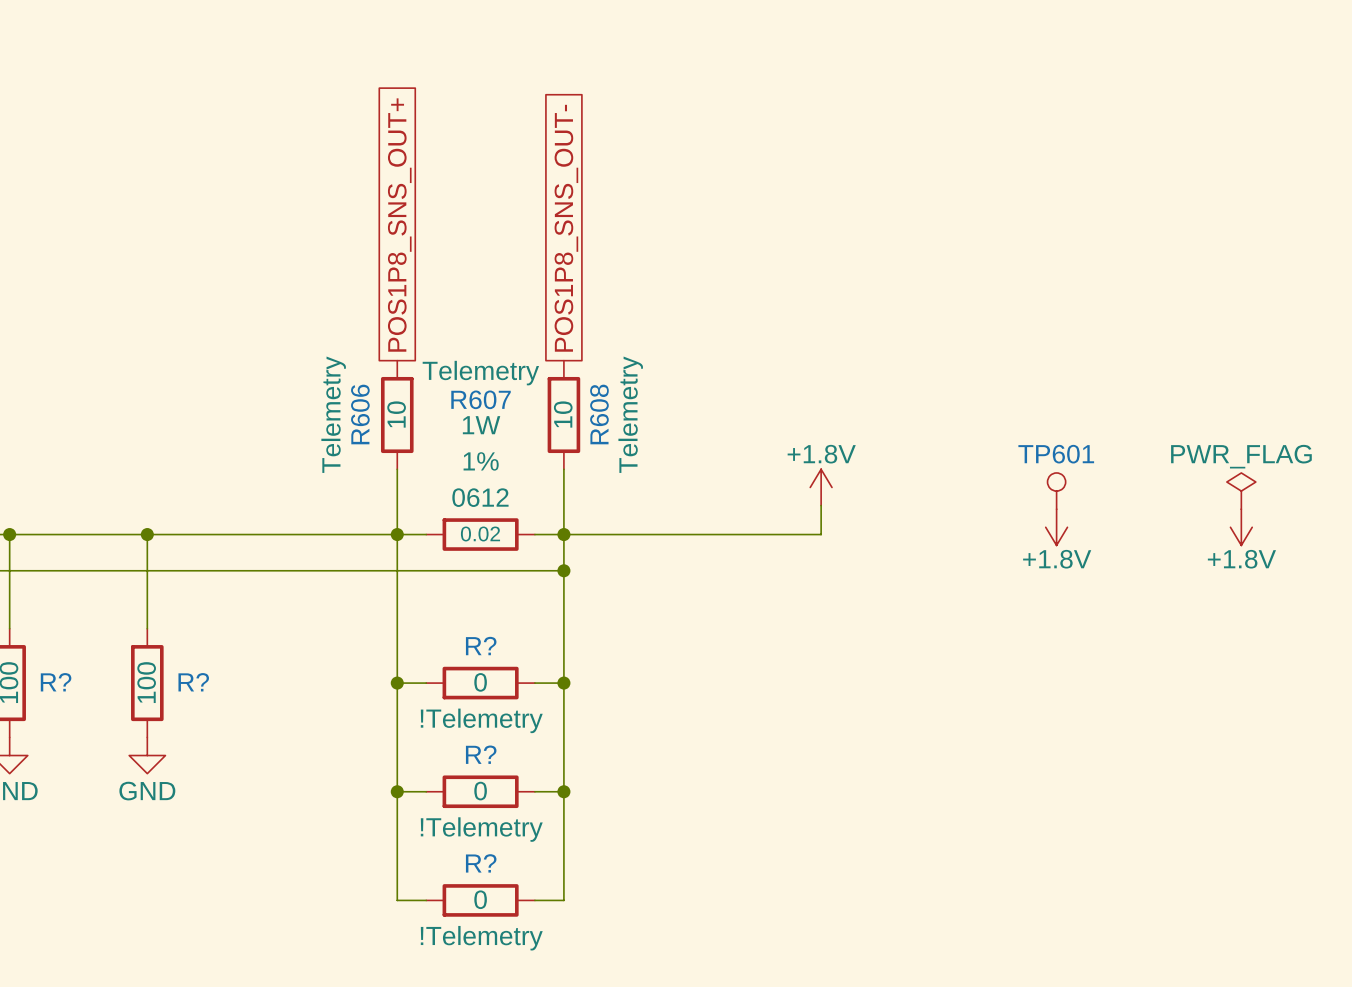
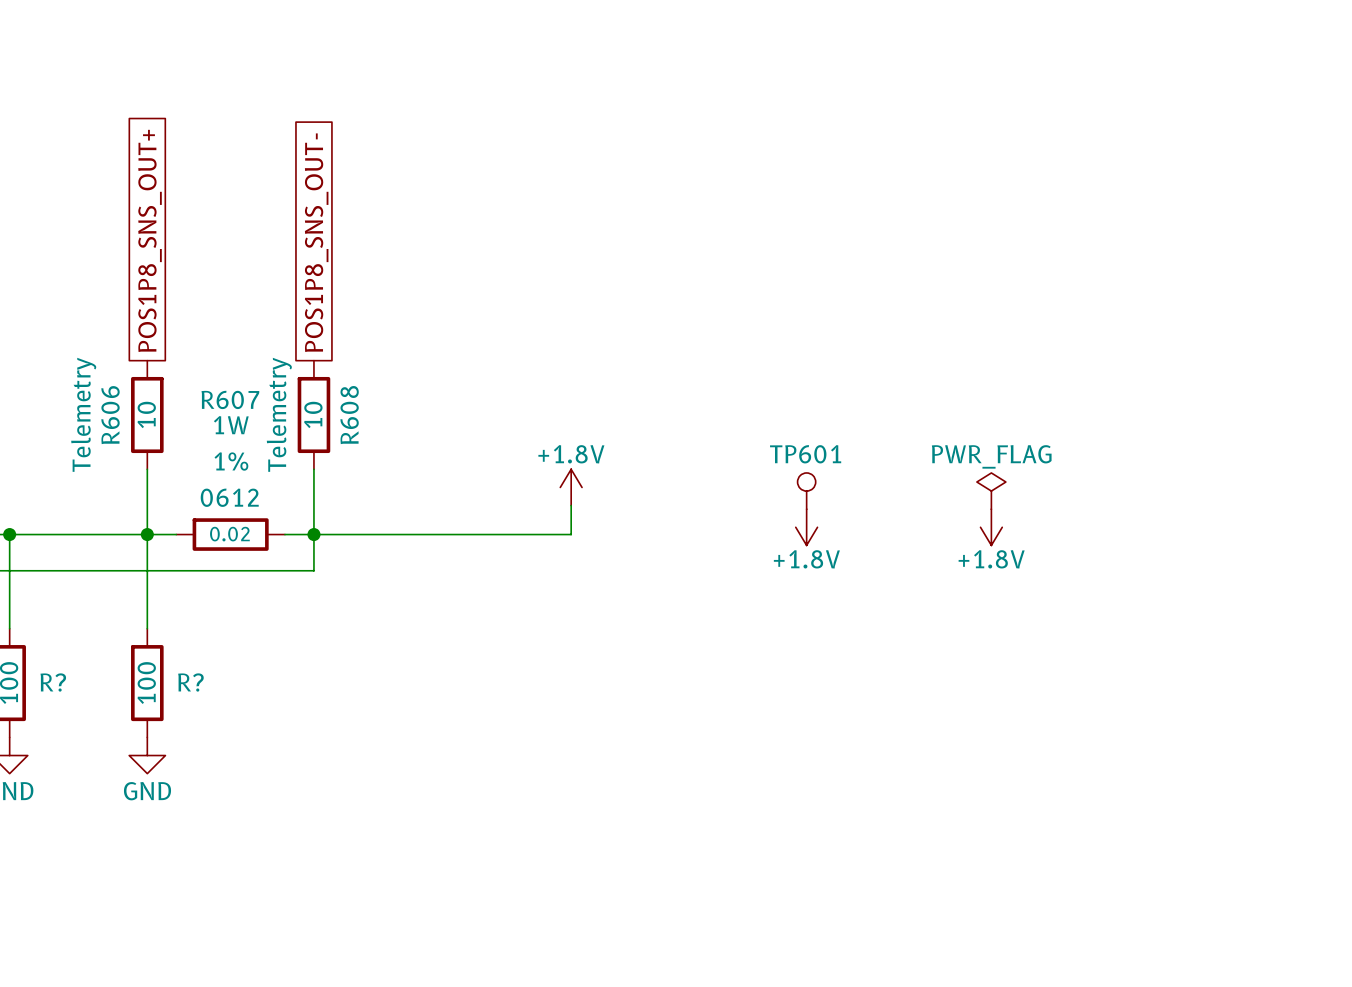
global label position: POS1P8_SNS_OUT+ (399, 225) -> POS1P8_SNS_OUT+ (150, 240)
global label position: POS1P8_SNS_OUT- (566, 228) -> POS1P8_SNS_OUT- (316, 242)
R607 text: Telemetry (480, 373) -> none
R608 text position: Telemetry (630, 414) -> Telemetry (279, 414)
R606 position: (397, 415) -> (147, 415)
R608 position: (563, 415) -> (313, 415)
wire: none -> (147, 469) (147, 534)
wire: (397, 469) (397, 900) (426, 900) -> none
wire: (563, 469) (563, 900) (534, 900) -> none
power symbol: none -> +1.8V (571, 487)
power symbol rotation: 0° (821, 487) -> 180° (806, 527)
power symbol position: +1.8V (821, 487) -> +1.8V (806, 527)
TP601 position: (1056, 491) -> (806, 491)
power symbol position: PWR_FLAG (1241, 491) -> PWR_FLAG (991, 491)
wire: (821, 505) (821, 534) (571, 534) -> (571, 505) (571, 534)
power symbol position: +1.8V (1056, 527) -> +1.8V (991, 527)
power symbol: +1.8V (1241, 527) -> none
wire: (176, 534) (284, 534) -> (426, 534) (534, 534)
junction position: (397, 534) -> (313, 534)
R607 position: (480, 534) -> (230, 534)
junction: (563, 534) -> none
wire: (313, 570) (563, 570) -> (313, 570) (313, 469)
junction: (563, 570) -> none
wire: (397, 683) (426, 683) -> none
junction: (397, 683) -> none
R?: 0 (480, 683) -> none
wire: (534, 683) (563, 683) -> none
junction: (563, 683) -> none
wire: (397, 791) (426, 791) -> none
junction: (397, 791) -> none
R?: 0 (480, 791) -> none
wire: (534, 791) (563, 791) -> none
junction: (563, 791) -> none
R?: 0 (480, 900) -> none

